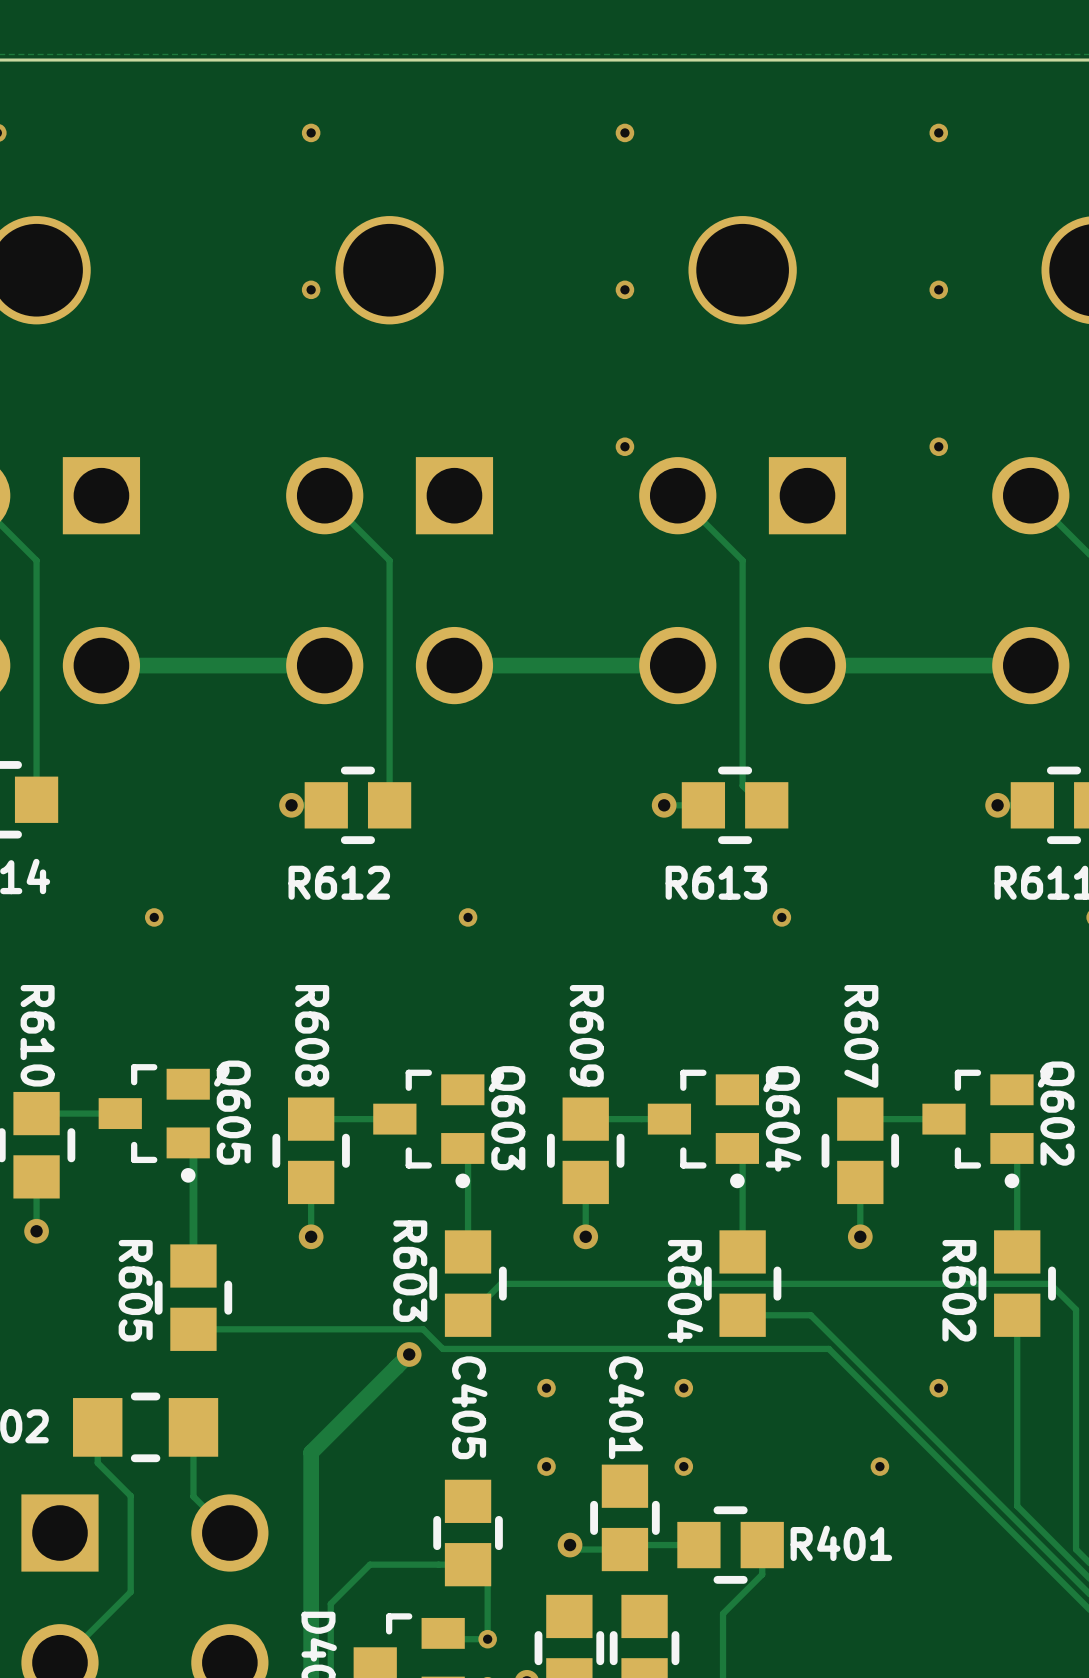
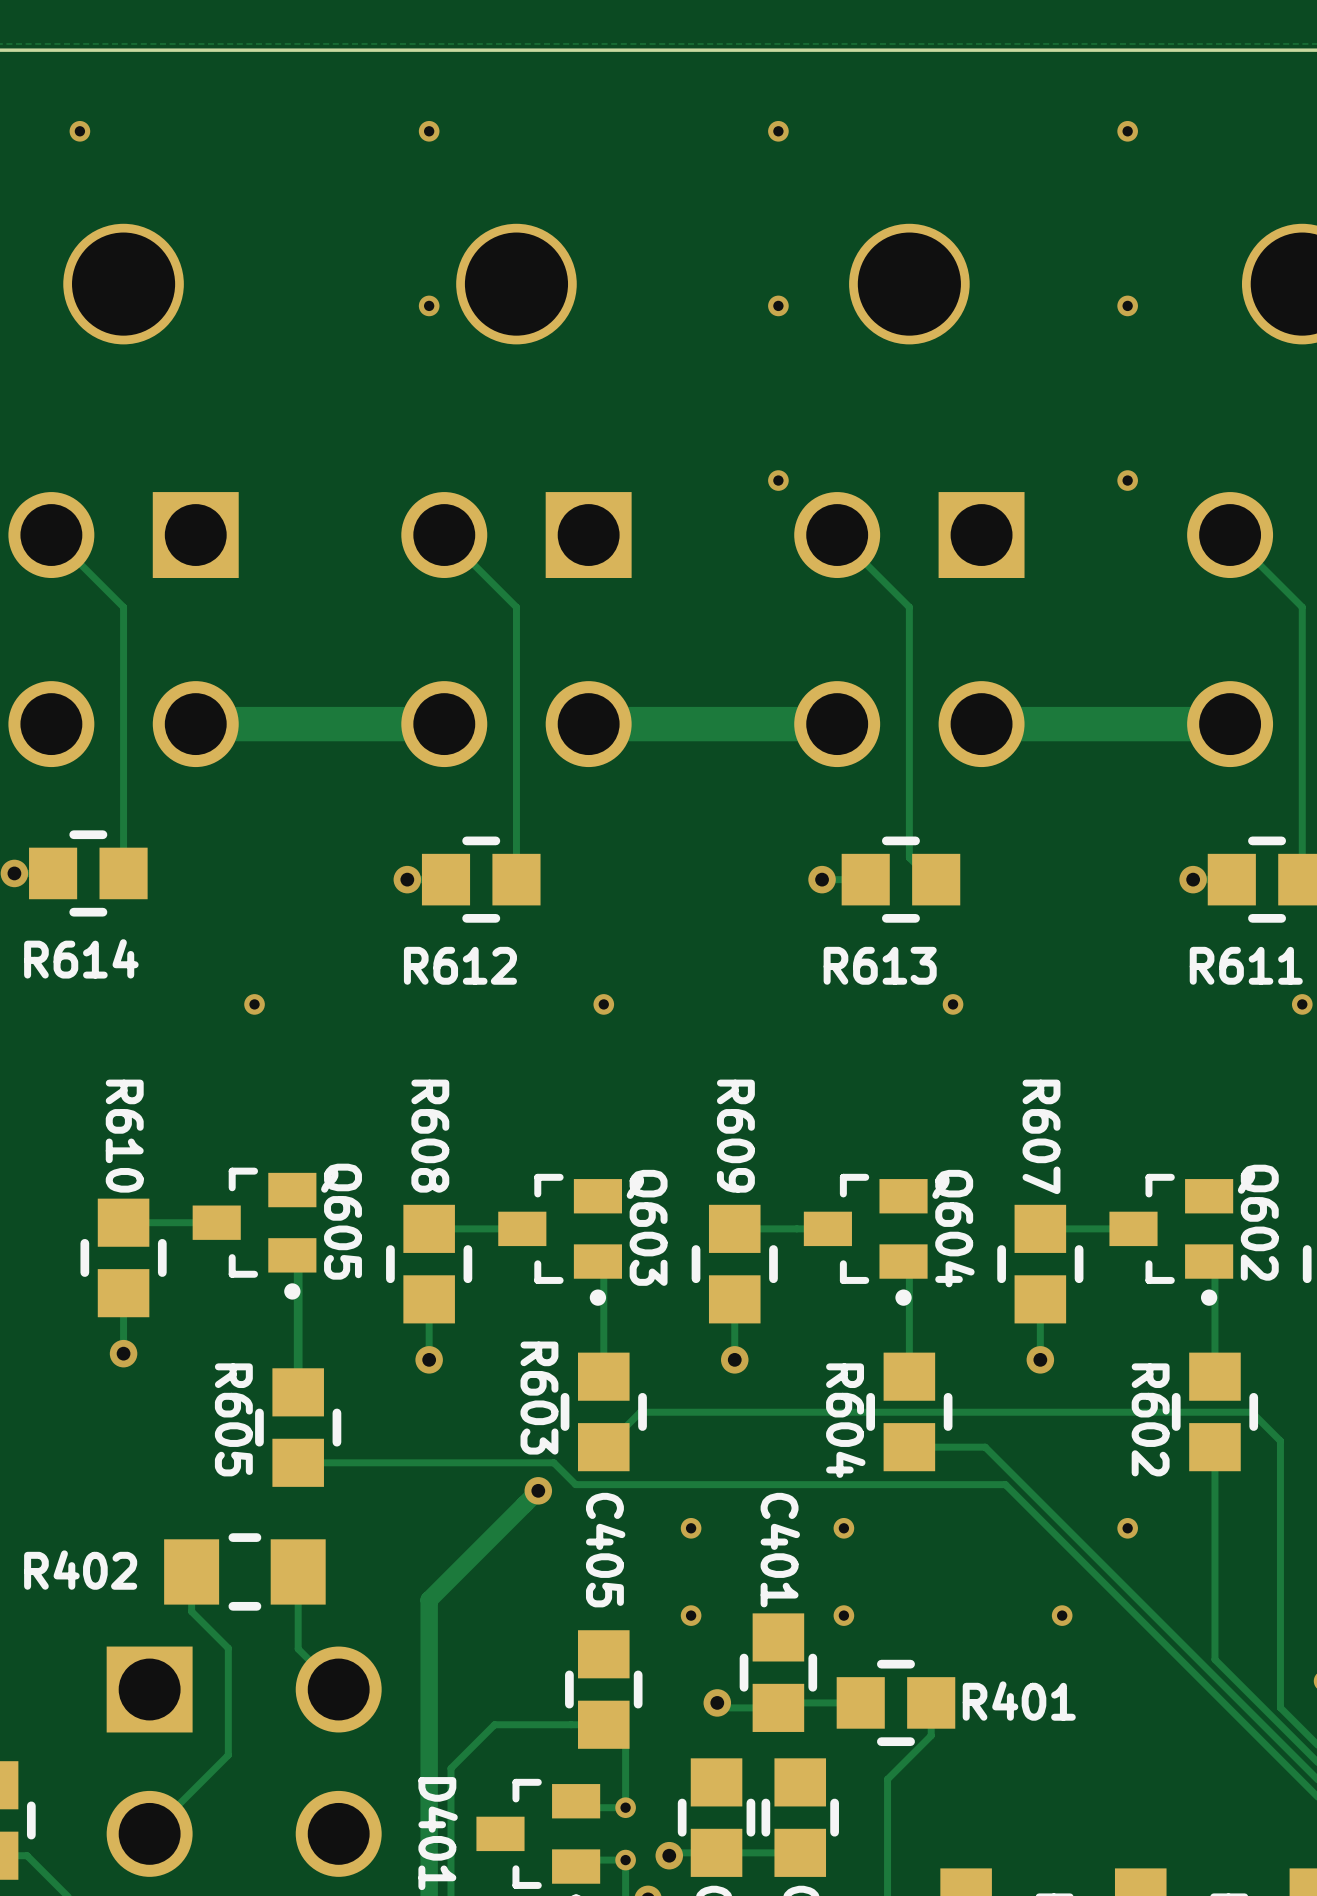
track width: thin (324, 665) (101, 665) -> thick (444, 724) (195, 724)
track width: thin (677, 665) (454, 665) -> thick (837, 724) (588, 724)
track width: thin (1030, 665) (807, 665) -> thick (1230, 724) (981, 724)

